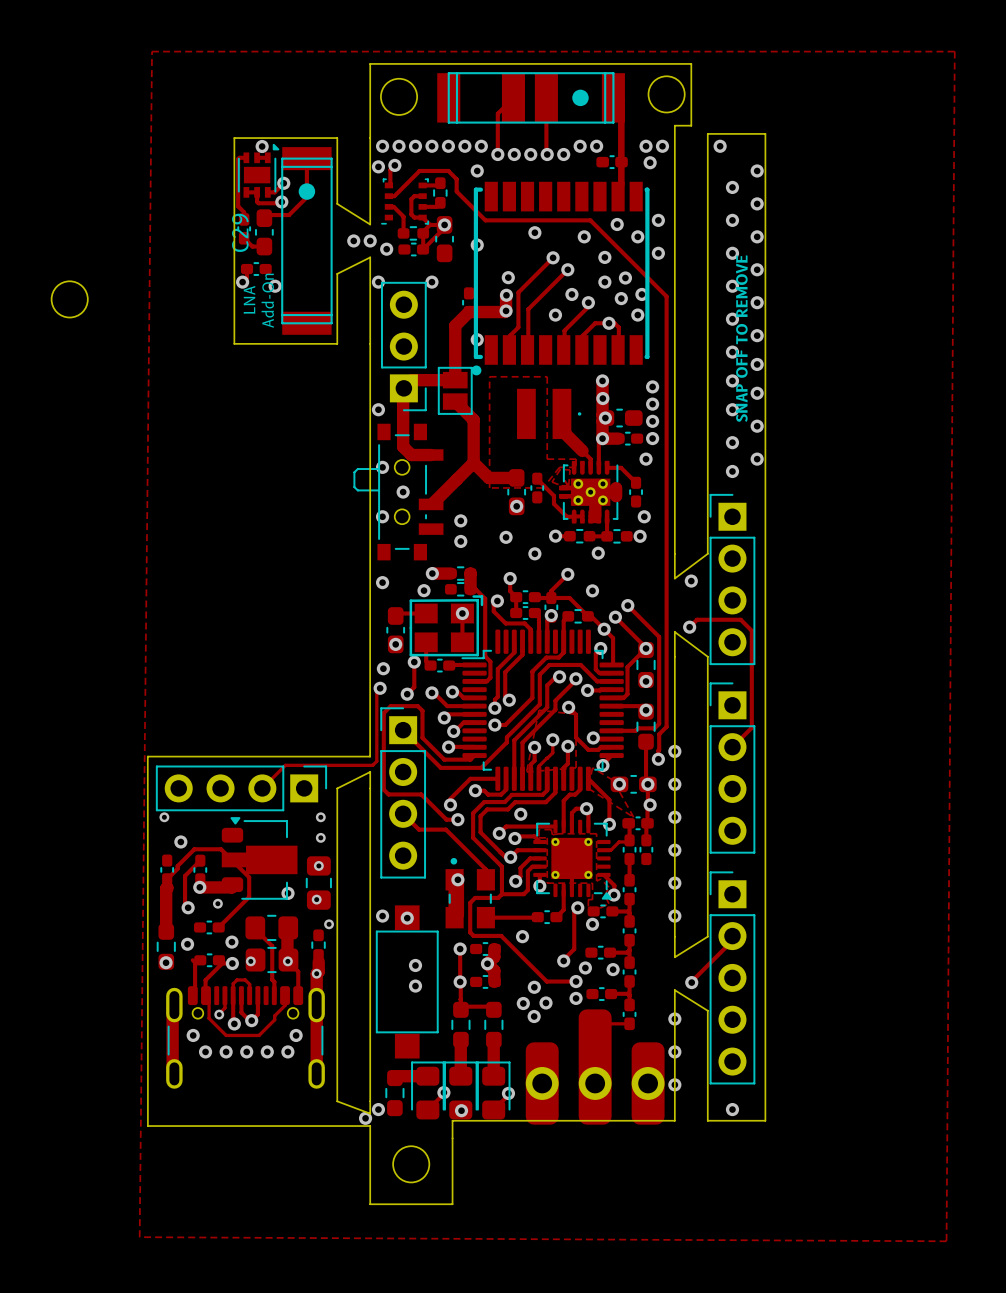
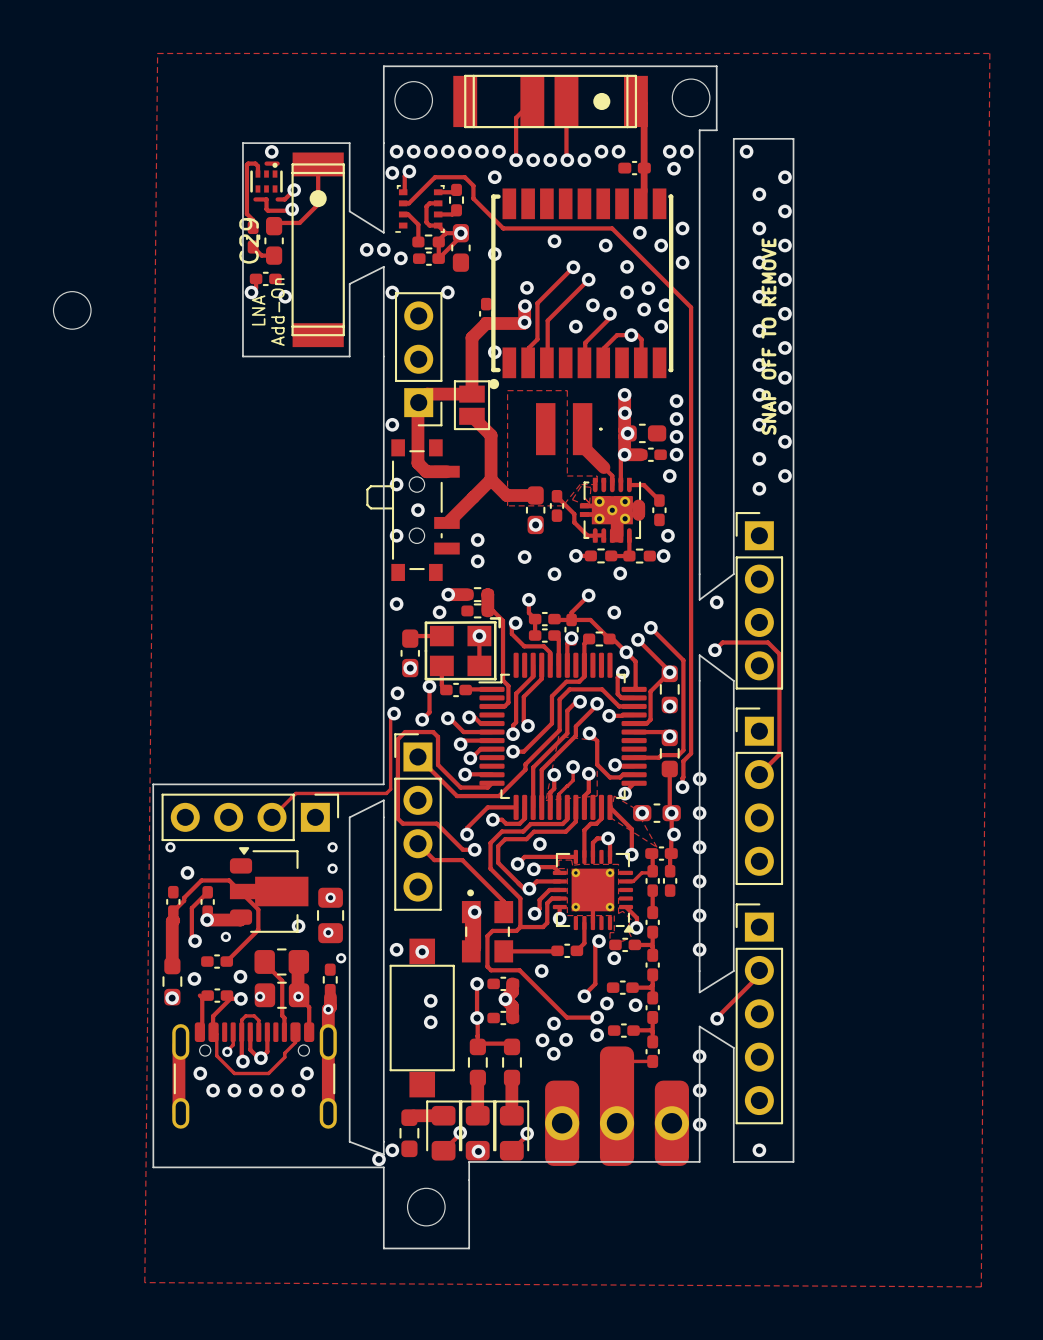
part footprint: [237, 143, 280, 198] -> [250, 162, 283, 193]
track: none -> (255, 163) (257, 166) (257, 174)

